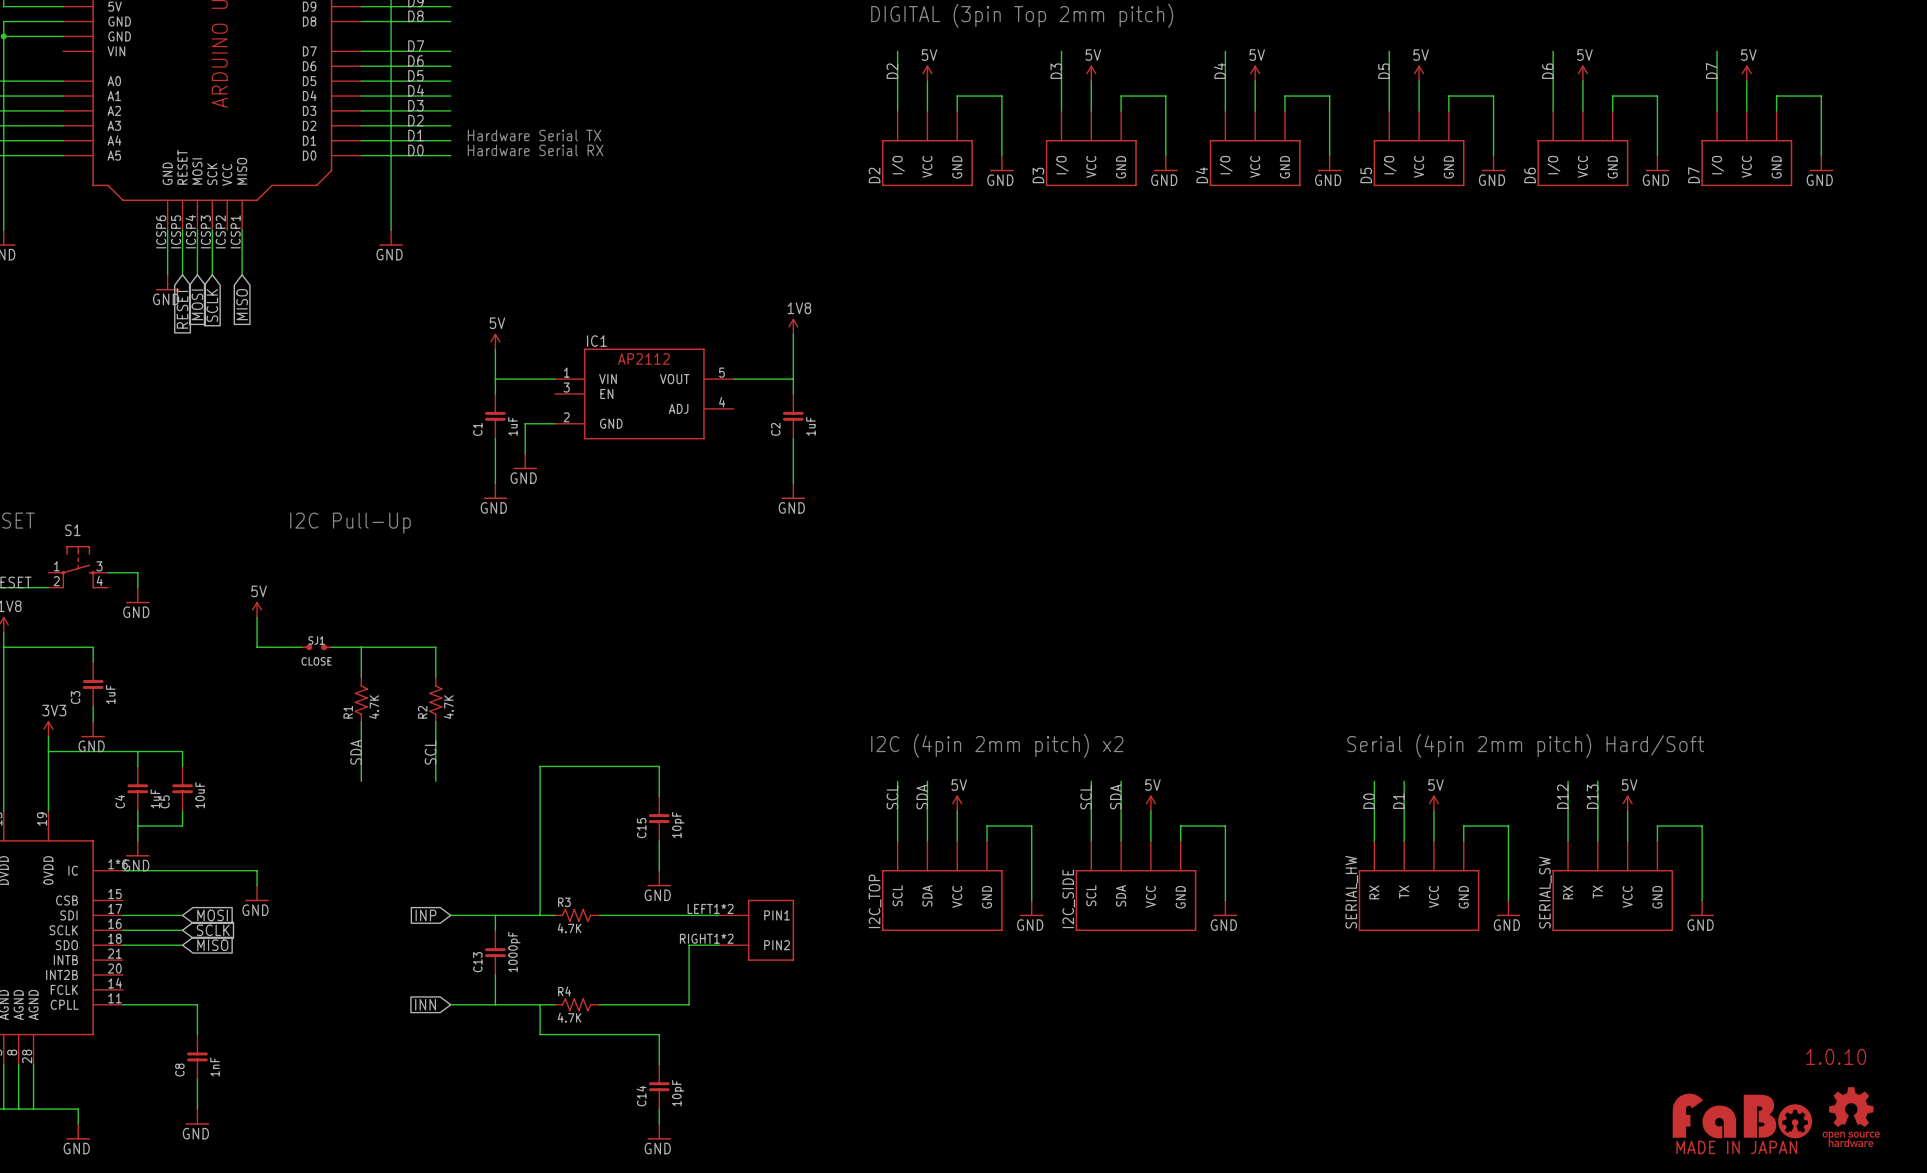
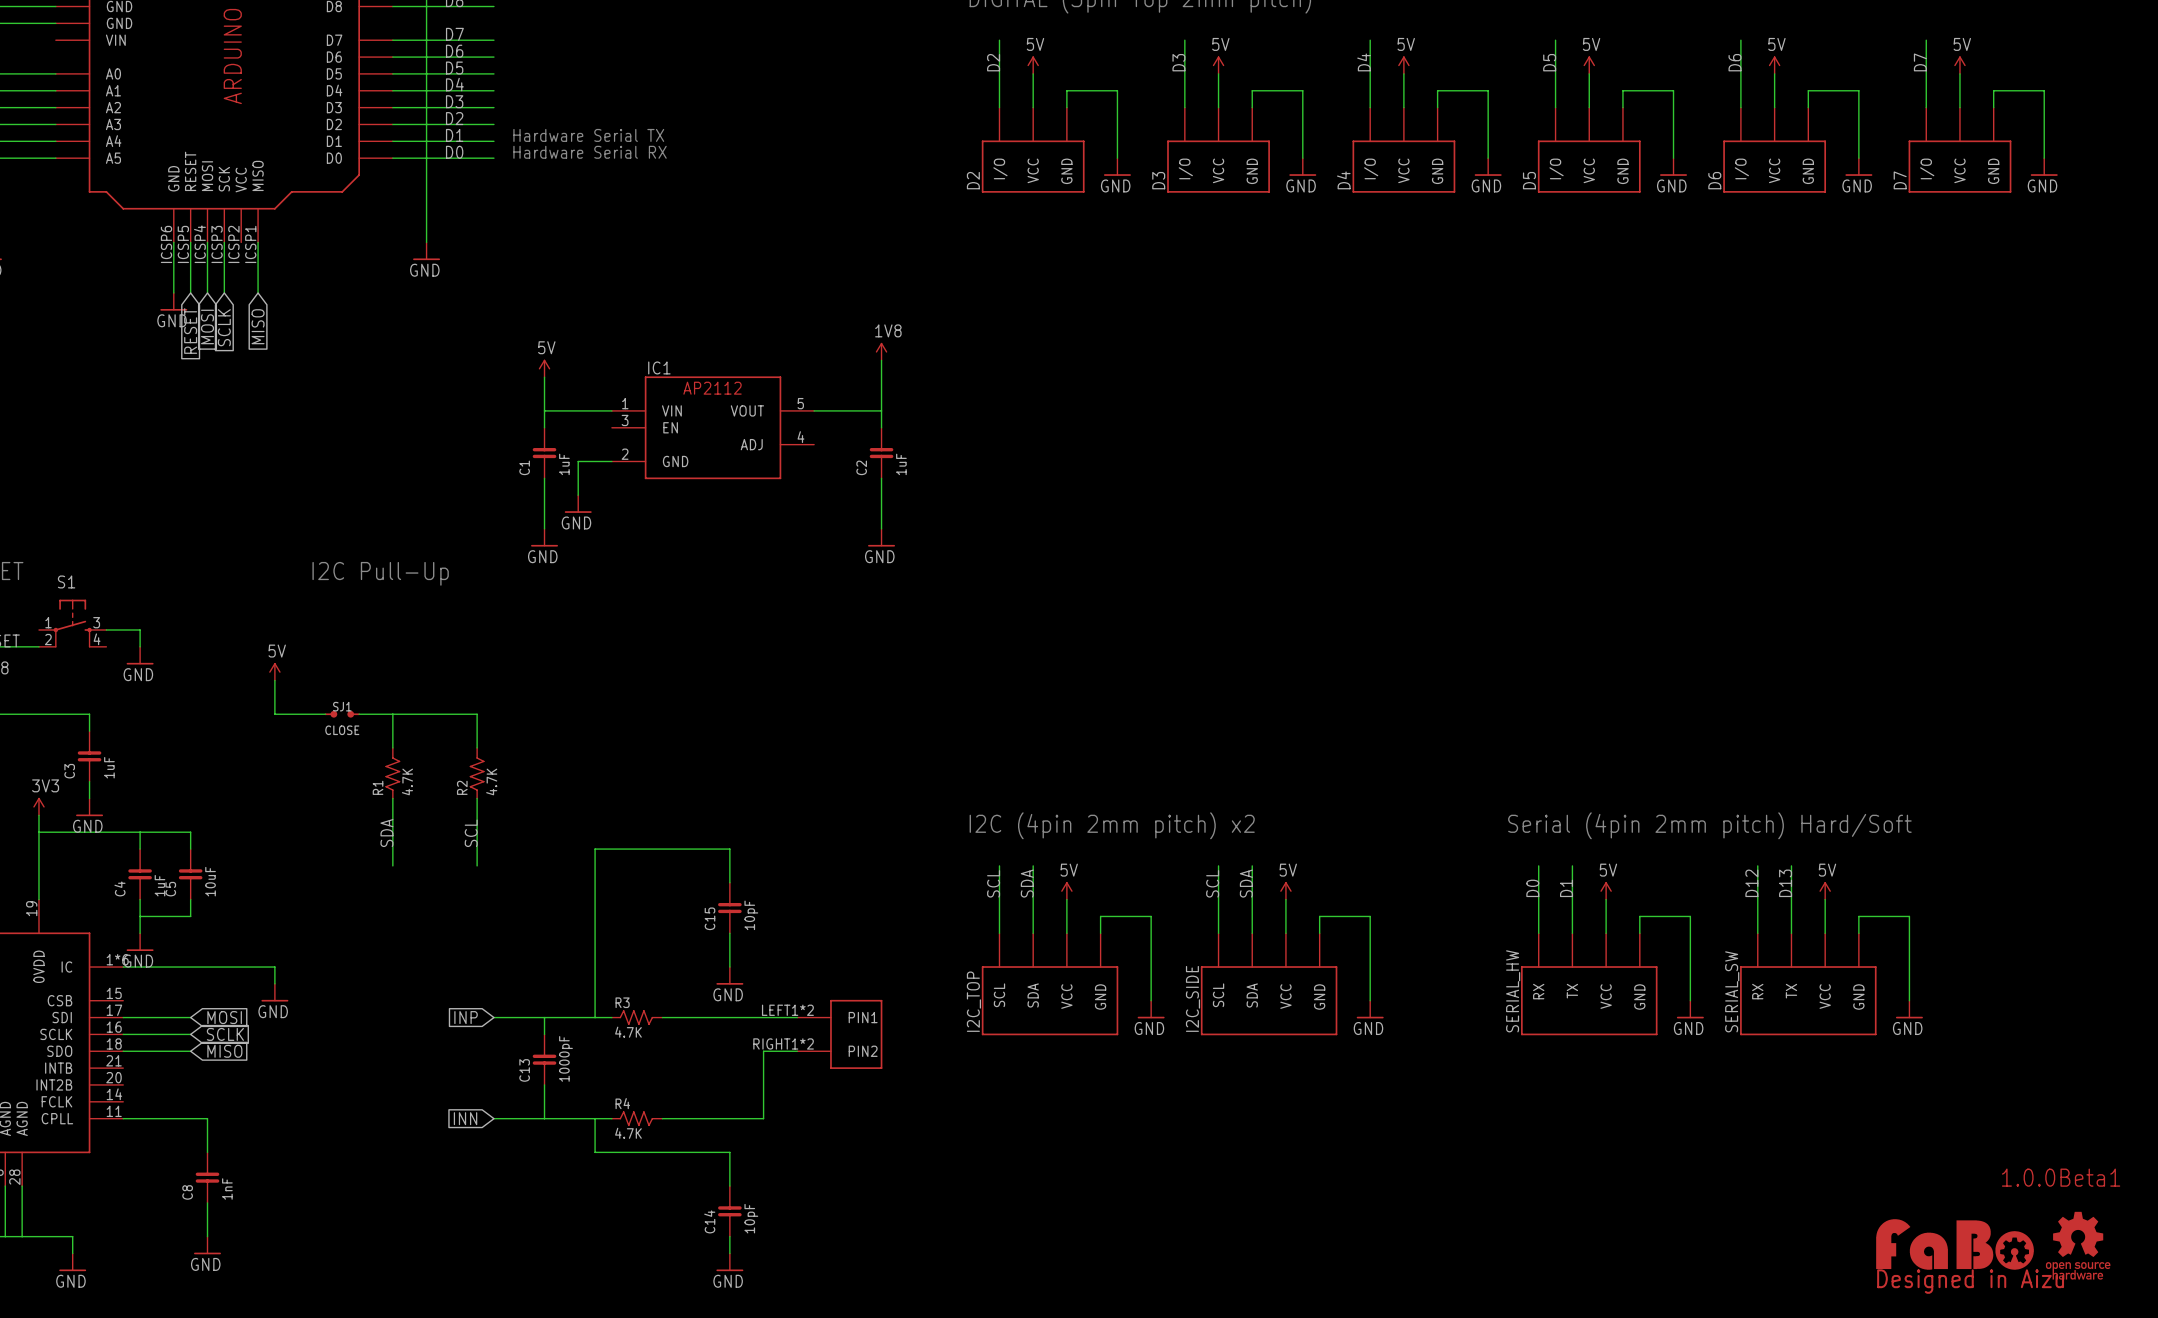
text: 1.0.10 (1836, 1056) -> 1.0.0Beta1 (2061, 1177)
part text: MADE IN JAPAN (1736, 1147) -> none
part text: none -> Designed in Aizu (1970, 1281)

